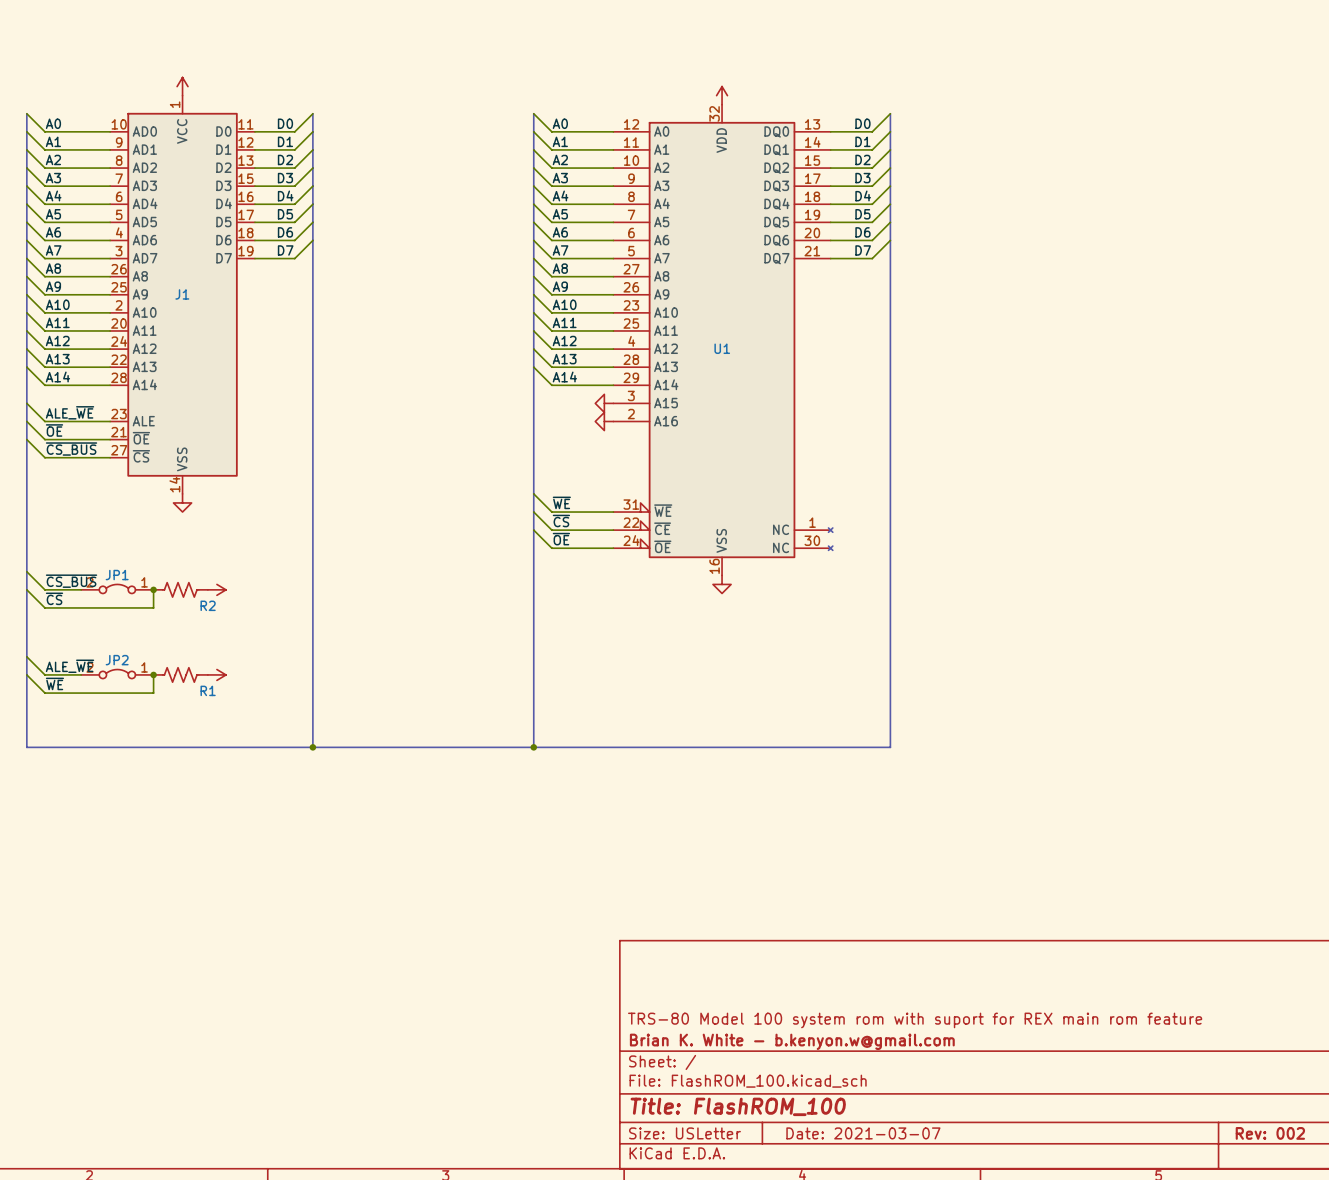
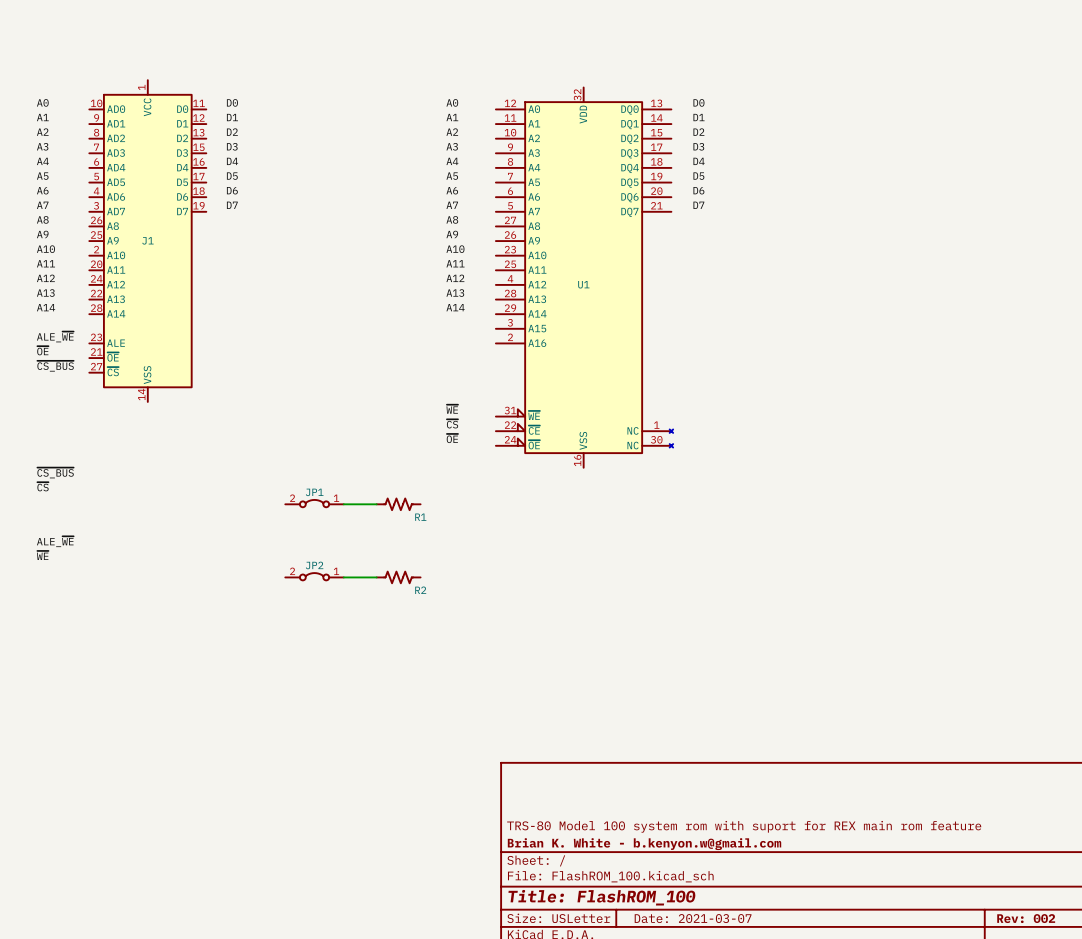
power symbol: (182, 86) -> none
power symbol: (722, 95) -> none
wire: (26, 113) (44, 131) (110, 131) -> none
bus: (26, 113) (26, 747) (890, 747) (890, 113) -> none
wire: (312, 113) (294, 131) (254, 131) -> none
bus: (312, 113) (312, 747) -> none
wire: (533, 113) (551, 131) (613, 131) -> none
bus: (533, 113) (533, 747) -> none
wire: (890, 113) (872, 131) (830, 131) -> none
wire: (26, 131) (44, 149) (110, 149) -> none
wire: (312, 131) (294, 149) (254, 149) -> none
wire: (533, 131) (551, 149) (613, 149) -> none
wire: (890, 131) (872, 149) (830, 149) -> none
wire: (26, 149) (44, 168) (110, 168) -> none
wire: (312, 149) (294, 168) (254, 168) -> none
wire: (533, 149) (551, 168) (613, 168) -> none
wire: (890, 149) (872, 168) (830, 168) -> none
wire: (26, 168) (44, 186) (110, 186) -> none
wire: (312, 168) (294, 186) (254, 186) -> none
wire: (533, 168) (551, 186) (613, 186) -> none
wire: (890, 168) (872, 186) (830, 186) -> none
wire: (26, 186) (44, 204) (110, 204) -> none
wire: (312, 186) (294, 204) (254, 204) -> none
wire: (533, 186) (551, 204) (613, 204) -> none
wire: (890, 186) (872, 204) (830, 204) -> none
wire: (26, 204) (44, 222) (110, 222) -> none
wire: (312, 204) (294, 222) (254, 222) -> none
wire: (533, 204) (551, 222) (613, 222) -> none
wire: (890, 204) (872, 222) (830, 222) -> none
wire: (26, 222) (44, 240) (110, 240) -> none
wire: (312, 222) (294, 240) (254, 240) -> none
wire: (533, 222) (551, 240) (613, 240) -> none
wire: (890, 222) (872, 240) (830, 240) -> none
wire: (26, 240) (44, 258) (110, 258) -> none
wire: (312, 240) (294, 258) (254, 258) -> none
wire: (533, 240) (551, 258) (613, 258) -> none
wire: (890, 240) (872, 258) (830, 258) -> none
wire: (26, 258) (44, 276) (110, 276) -> none
wire: (533, 258) (551, 276) (613, 276) -> none
wire: (26, 276) (44, 294) (110, 294) -> none
wire: (533, 276) (551, 294) (613, 294) -> none
wire: (26, 294) (44, 312) (110, 312) -> none
wire: (533, 294) (551, 312) (613, 312) -> none
wire: (26, 312) (44, 330) (110, 330) -> none
wire: (533, 312) (551, 330) (613, 330) -> none
wire: (26, 330) (44, 349) (110, 349) -> none
wire: (533, 330) (551, 349) (613, 349) -> none
wire: (26, 349) (44, 367) (110, 367) -> none
wire: (533, 349) (551, 367) (613, 367) -> none
wire: (26, 367) (44, 385) (110, 385) -> none
wire: (533, 367) (551, 385) (613, 385) -> none
wire: (26, 403) (44, 421) (110, 421) -> none
power symbol: (604, 403) -> none
wire: (26, 421) (44, 439) (110, 439) -> none
power symbol: (604, 421) -> none
wire: (26, 439) (44, 457) (110, 457) -> none
wire: (533, 493) (551, 512) (613, 512) -> none
power symbol: (182, 502) -> none
wire: (533, 512) (551, 530) (613, 530) -> none
wire: (533, 530) (551, 548) (613, 548) -> none
wire: (26, 571) (44, 589) (81, 589) -> none
power symbol: (722, 584) -> none
JP1 position: (117, 588) -> (314, 503)
wire: (26, 589) (44, 607) (153, 607) (153, 589) -> none
junction: (153, 589) -> none
R2 position: (180, 589) -> (398, 577)
power symbol: (216, 589) -> none
wire: none -> (343, 504) (376, 504)
wire: (26, 656) (44, 674) (81, 674) -> none
wire: (26, 674) (44, 693) (153, 693) (153, 674) -> none
JP2 position: (117, 674) -> (314, 576)
junction: (153, 674) -> none
R1 position: (180, 674) -> (398, 504)
power symbol: (216, 674) -> none
wire: none -> (343, 577) (376, 577)
junction: (312, 747) -> none
junction: (533, 747) -> none

